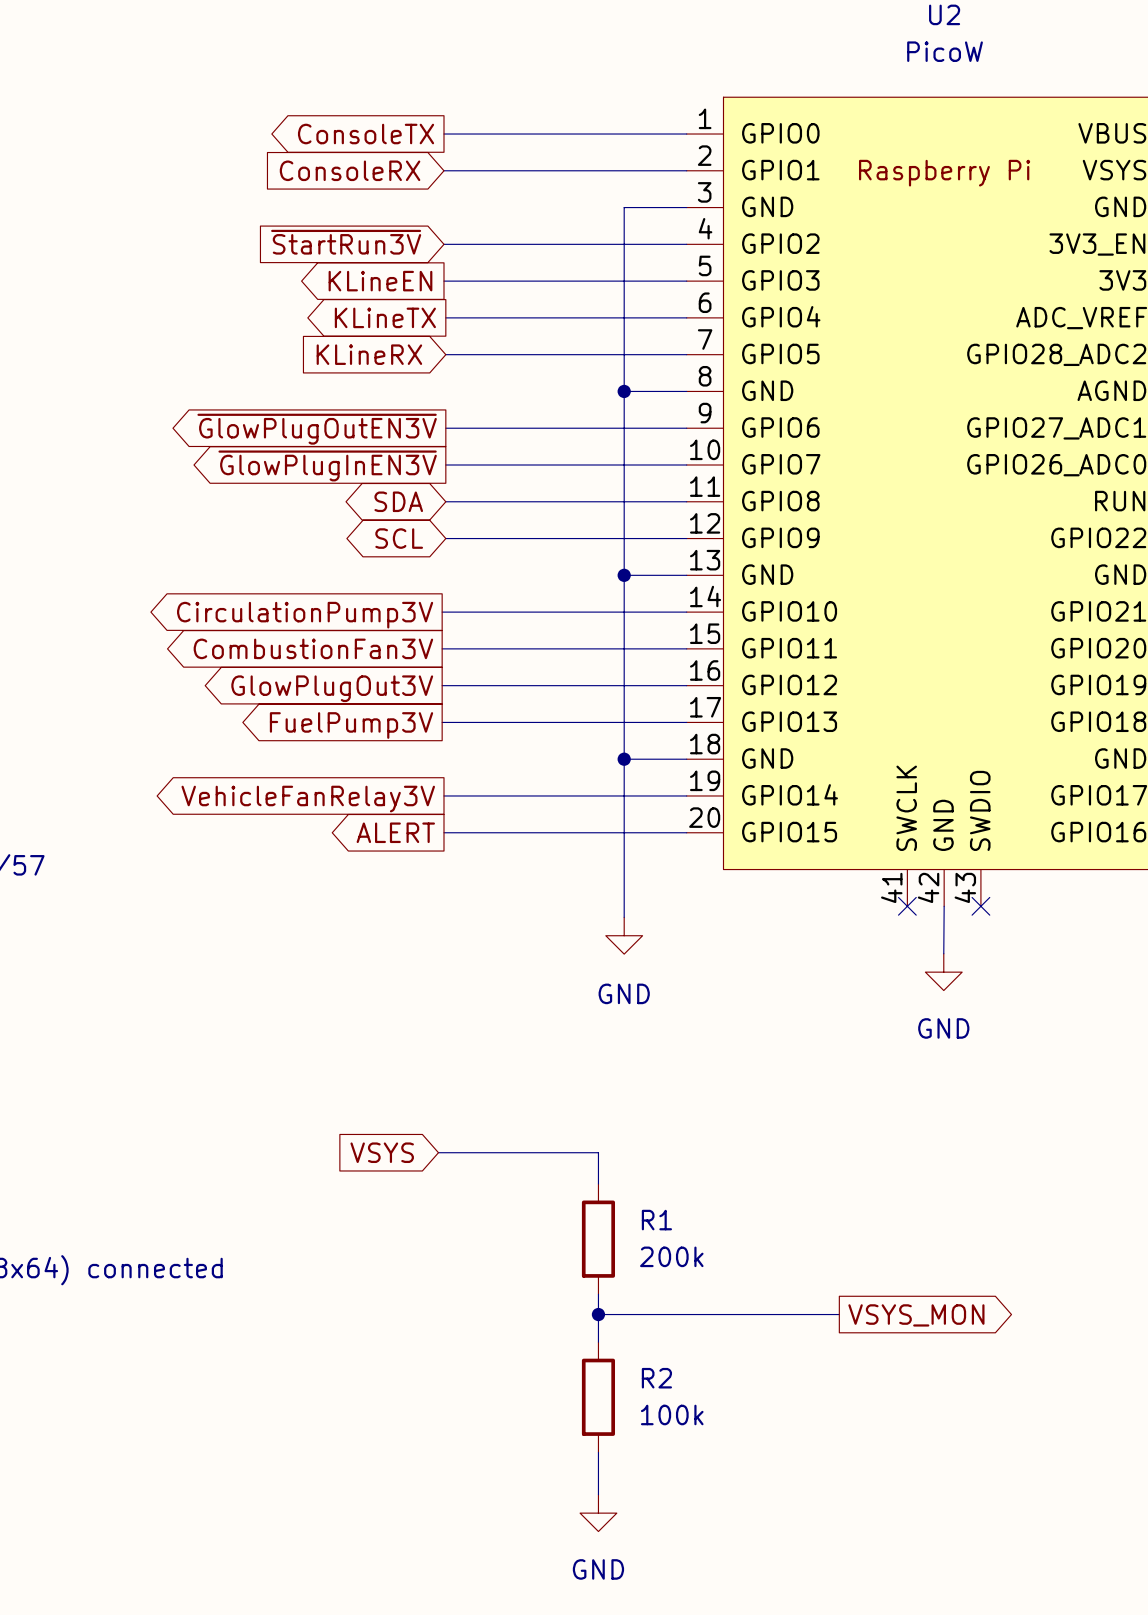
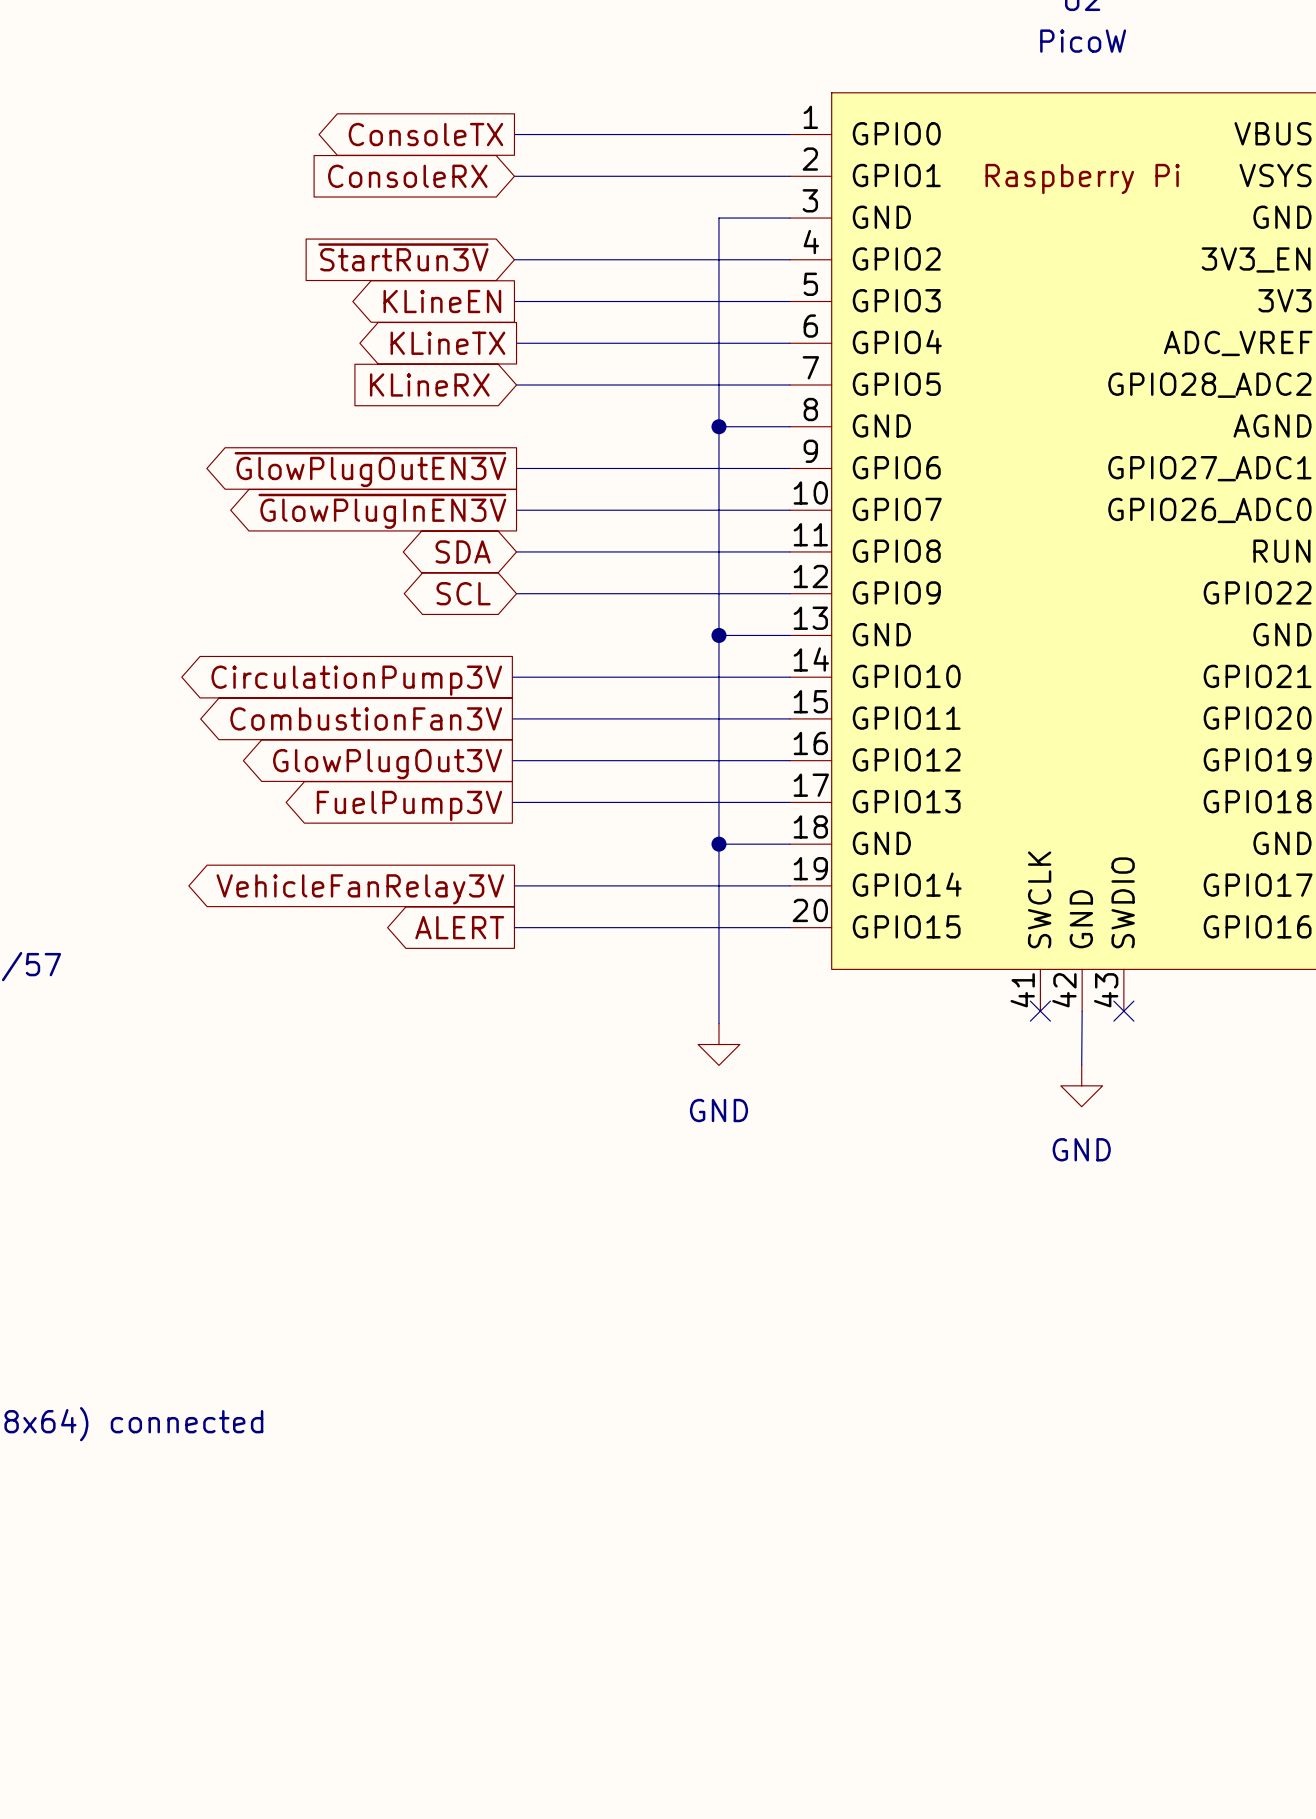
global label: VSYS (382, 1152) -> none
wire: (438, 1152) (598, 1152) (598, 1183) -> none
R1: 200k (598, 1239) -> none
wire: (598, 1294) (598, 1342) -> none
wire: (598, 1314) (839, 1314) -> none
junction: (598, 1314) -> none
global label: VSYS_MON (916, 1315) -> none
R2: 100k (598, 1397) -> none
wire: (598, 1452) (598, 1494) -> none
power symbol: GND (598, 1513) -> none

